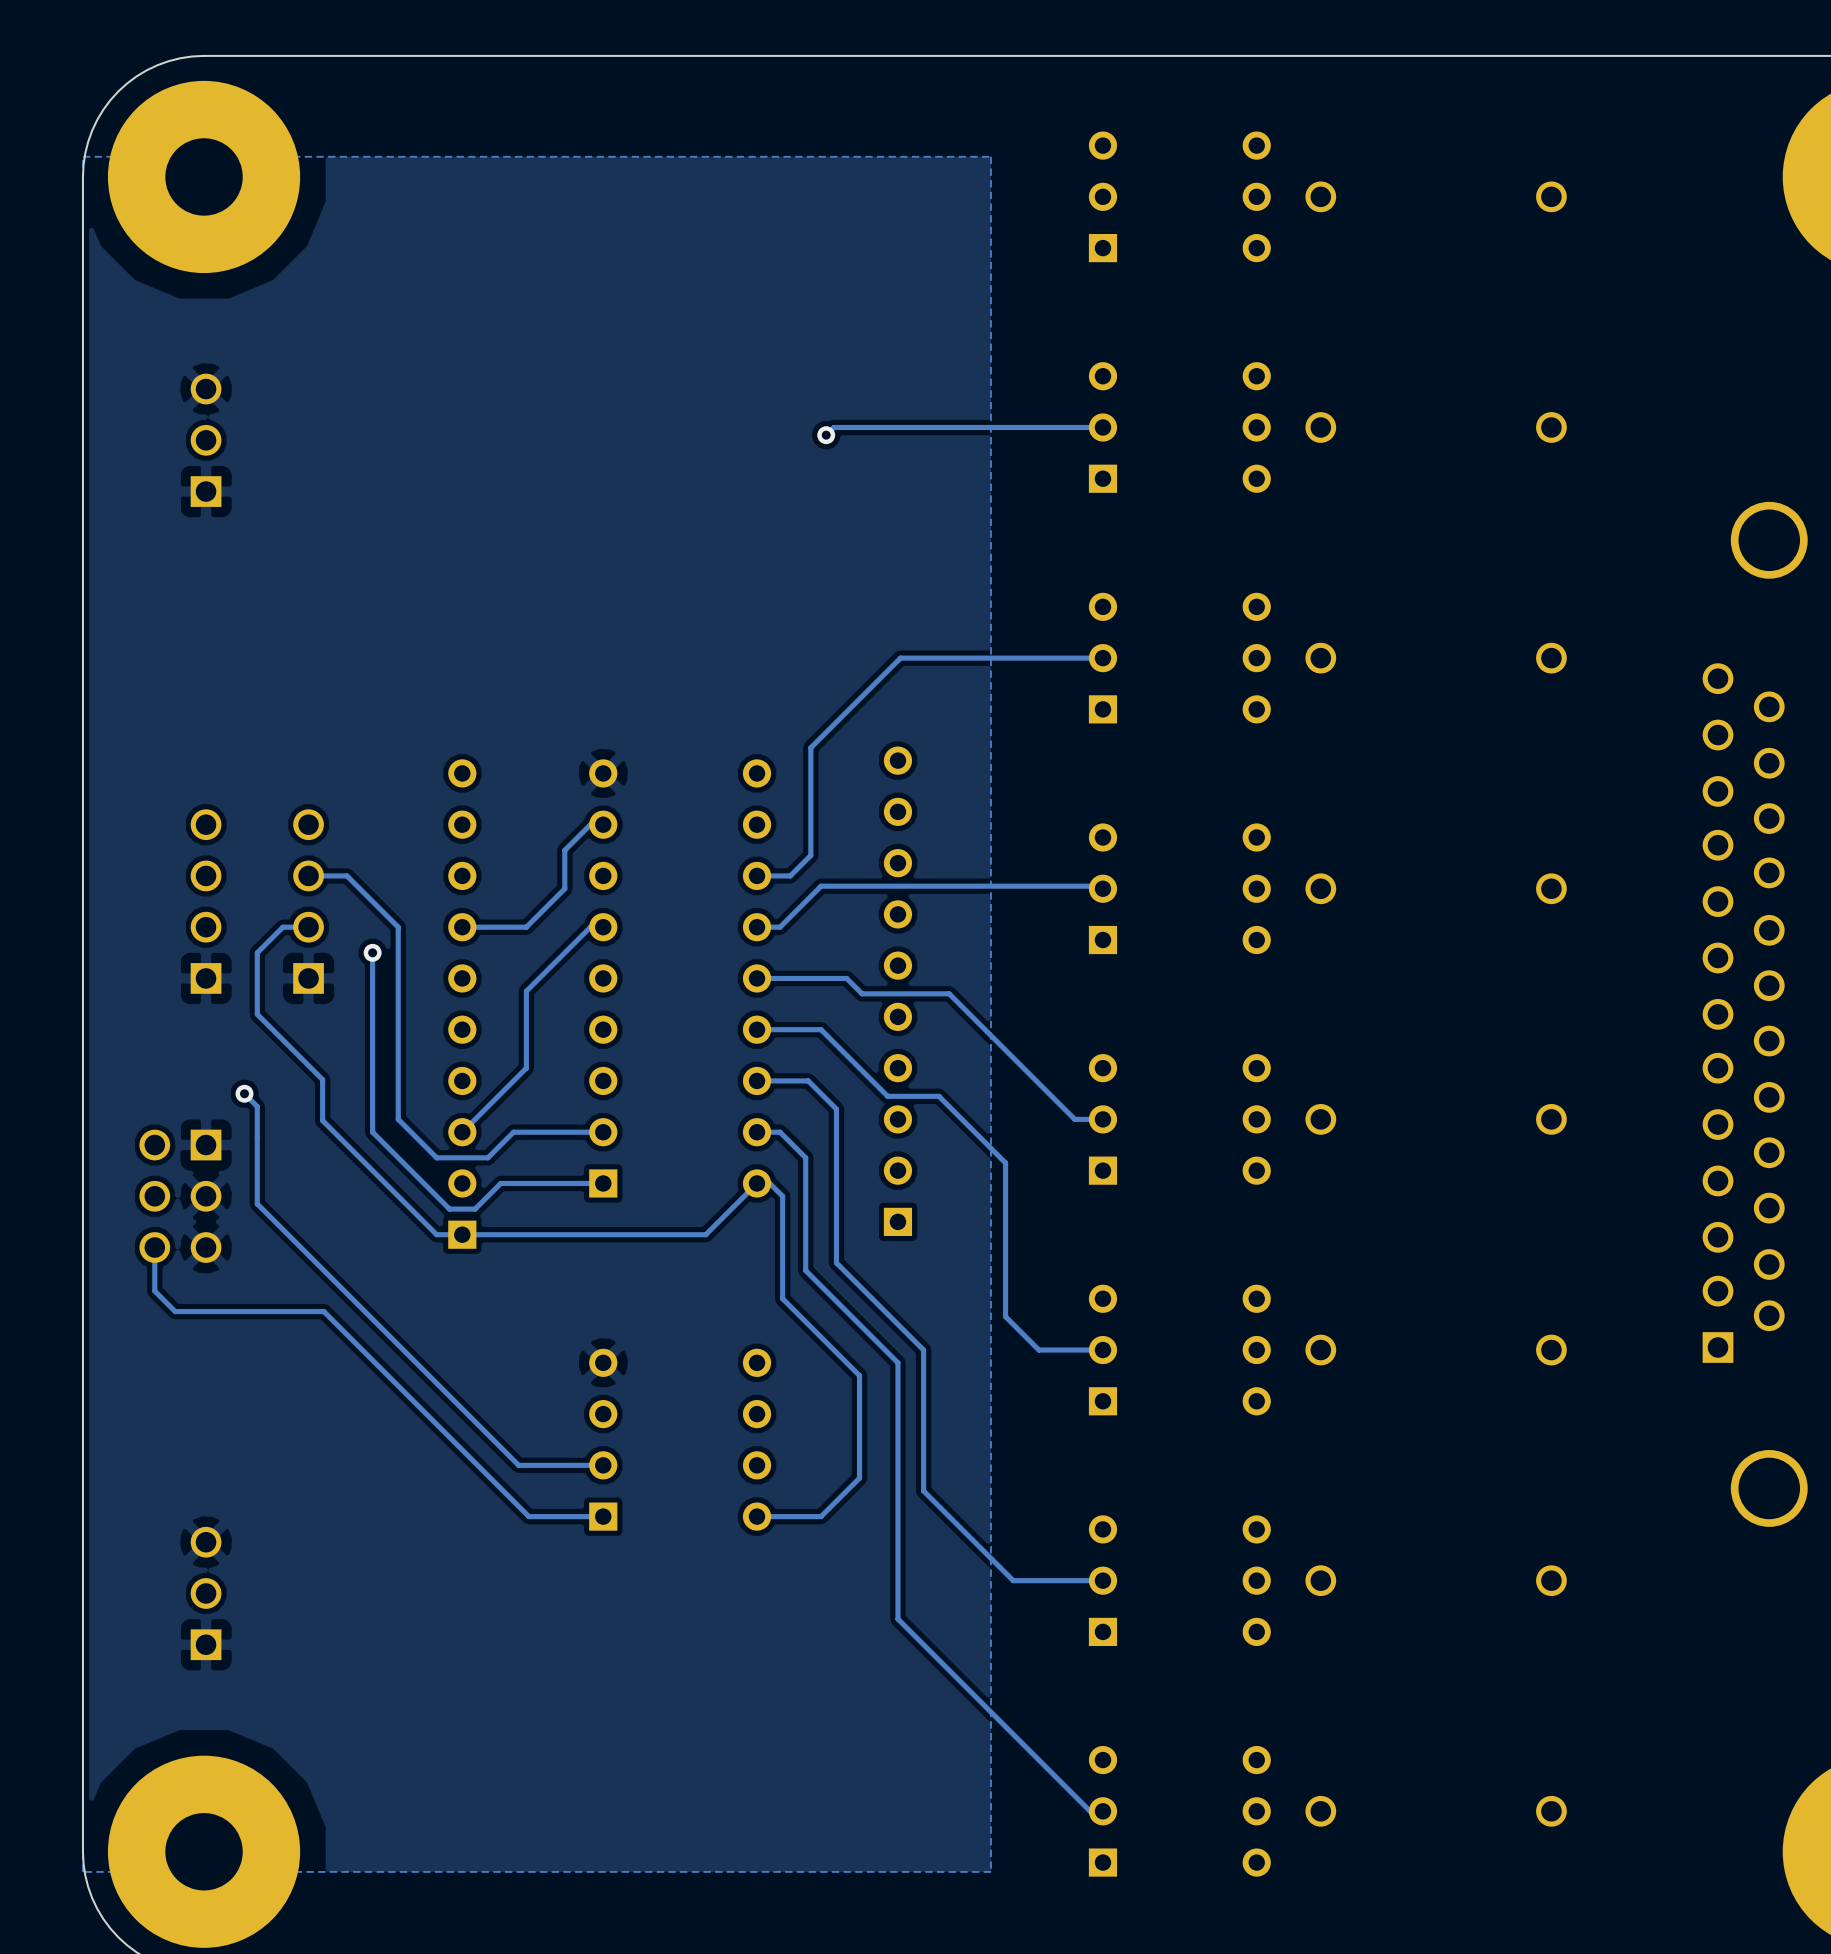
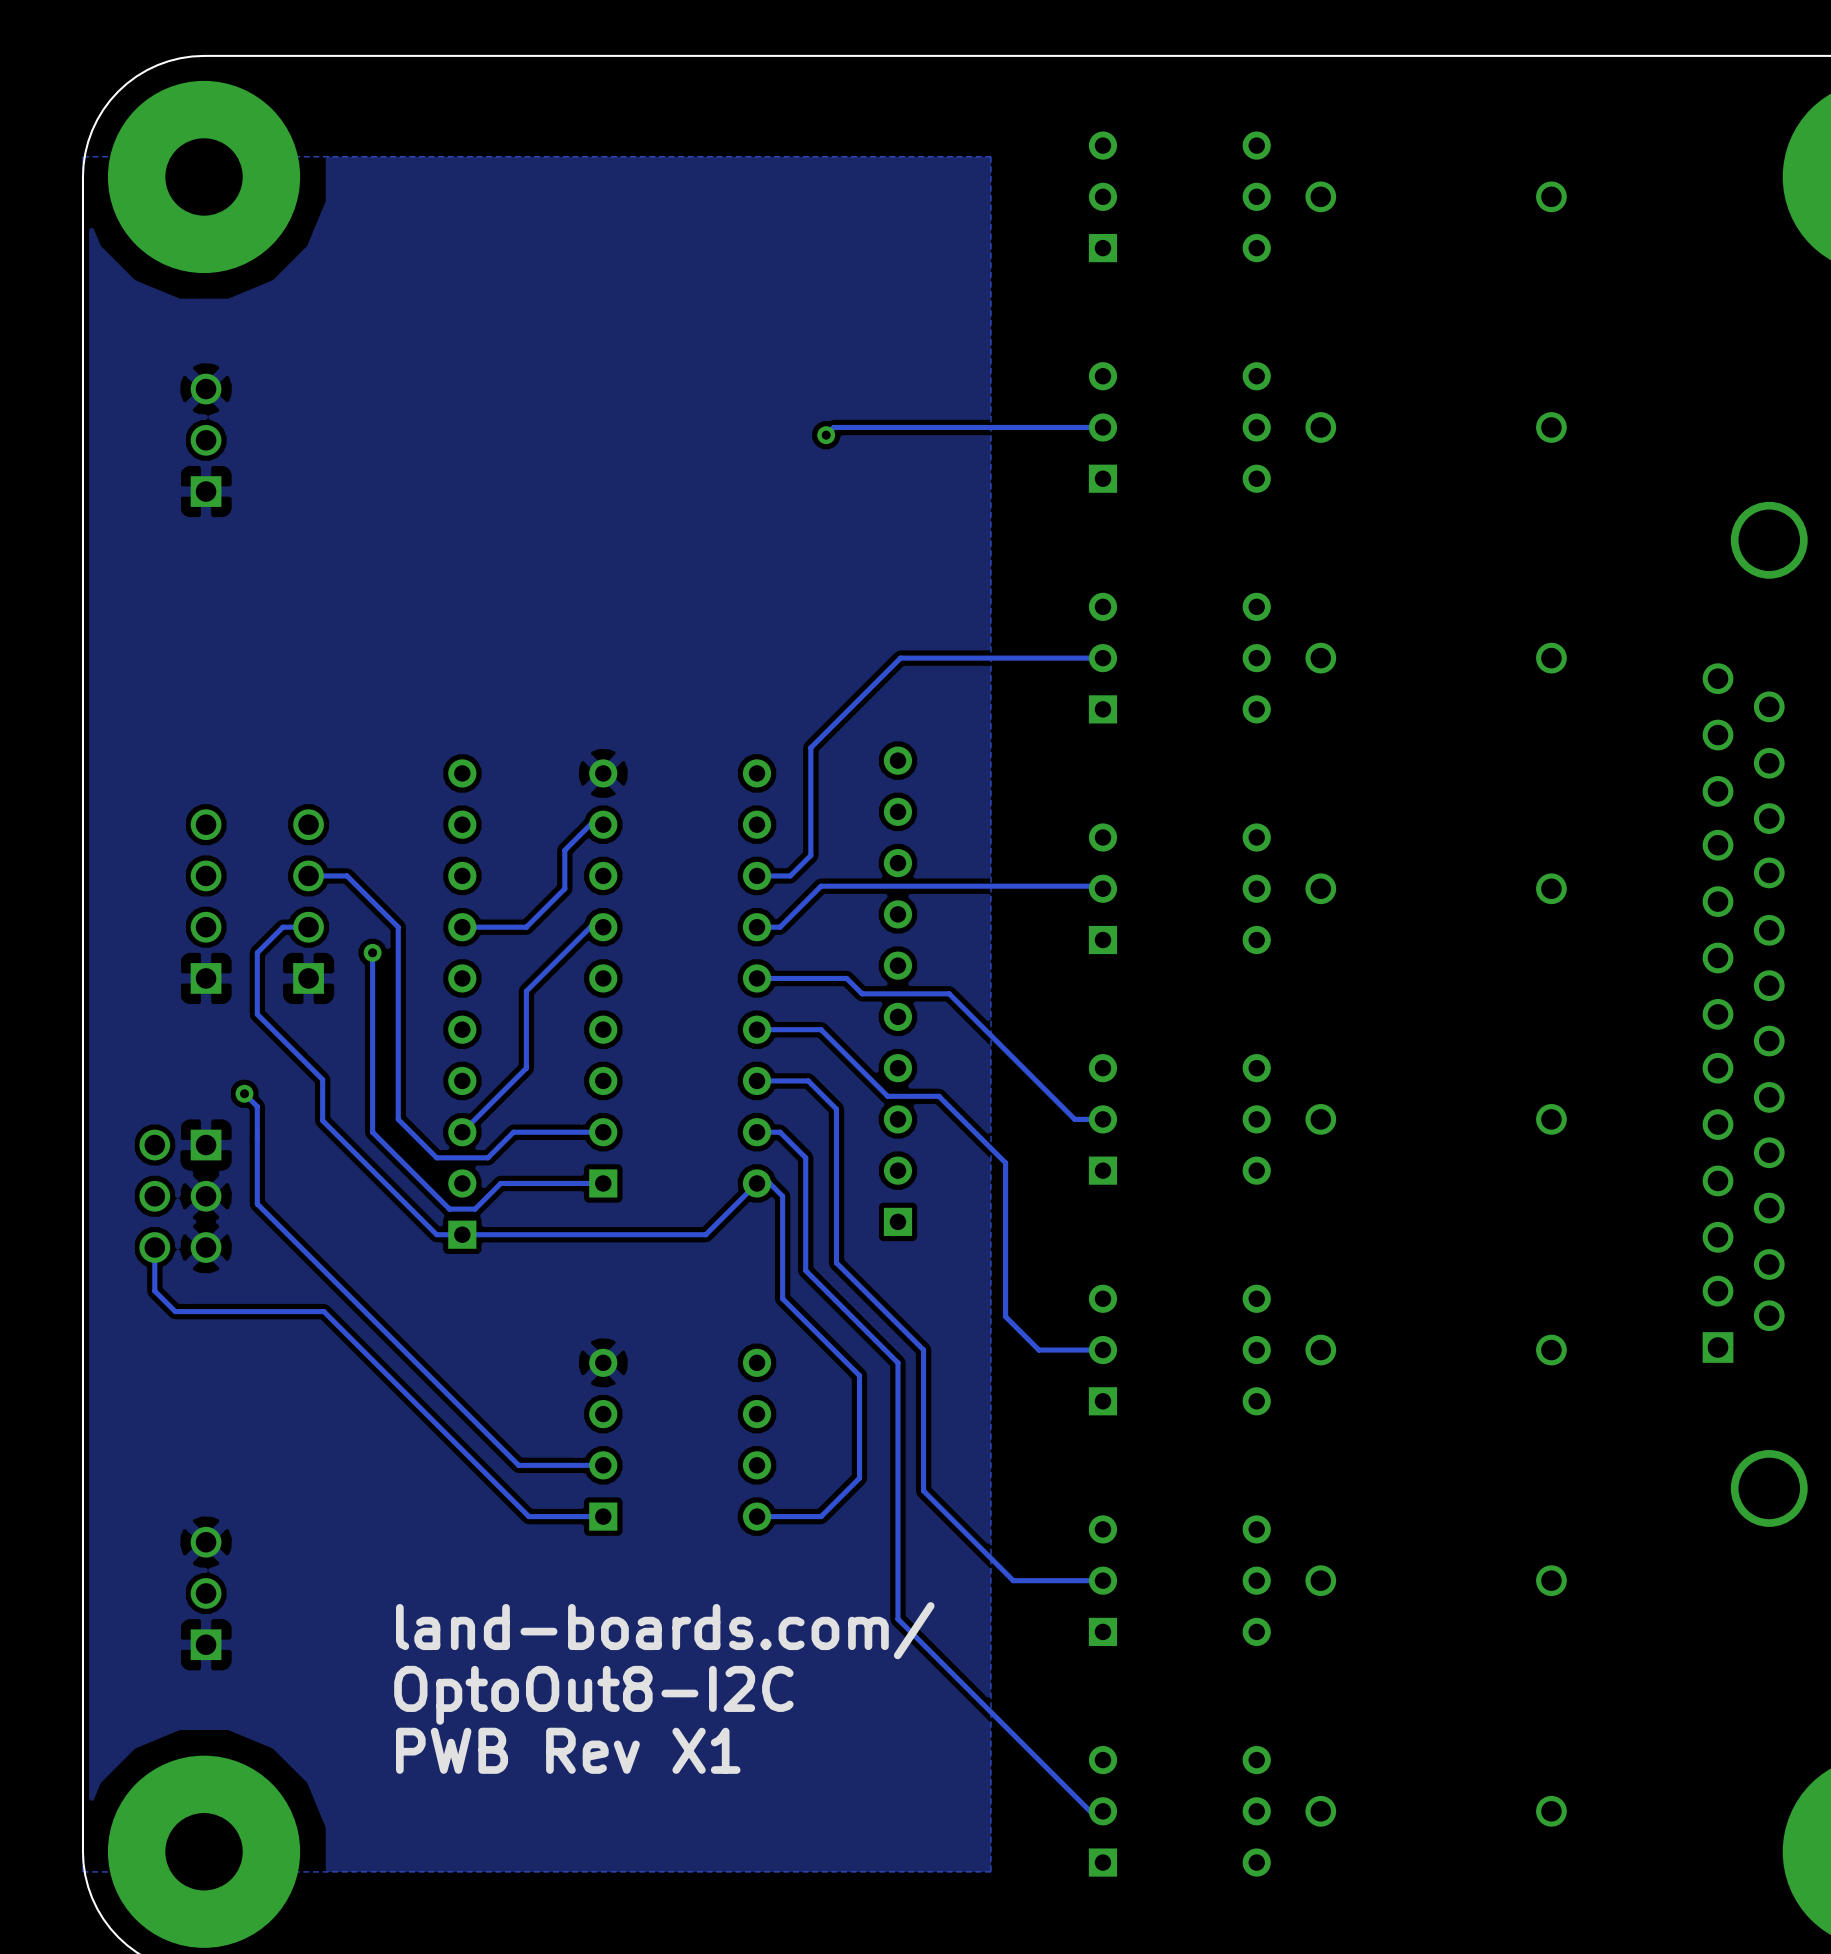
text: none -> land-boards.com/ (665, 1630)
text: none -> OptoOut8-I2C (593, 1695)
text: none -> PWB Rev X1 (568, 1750)

